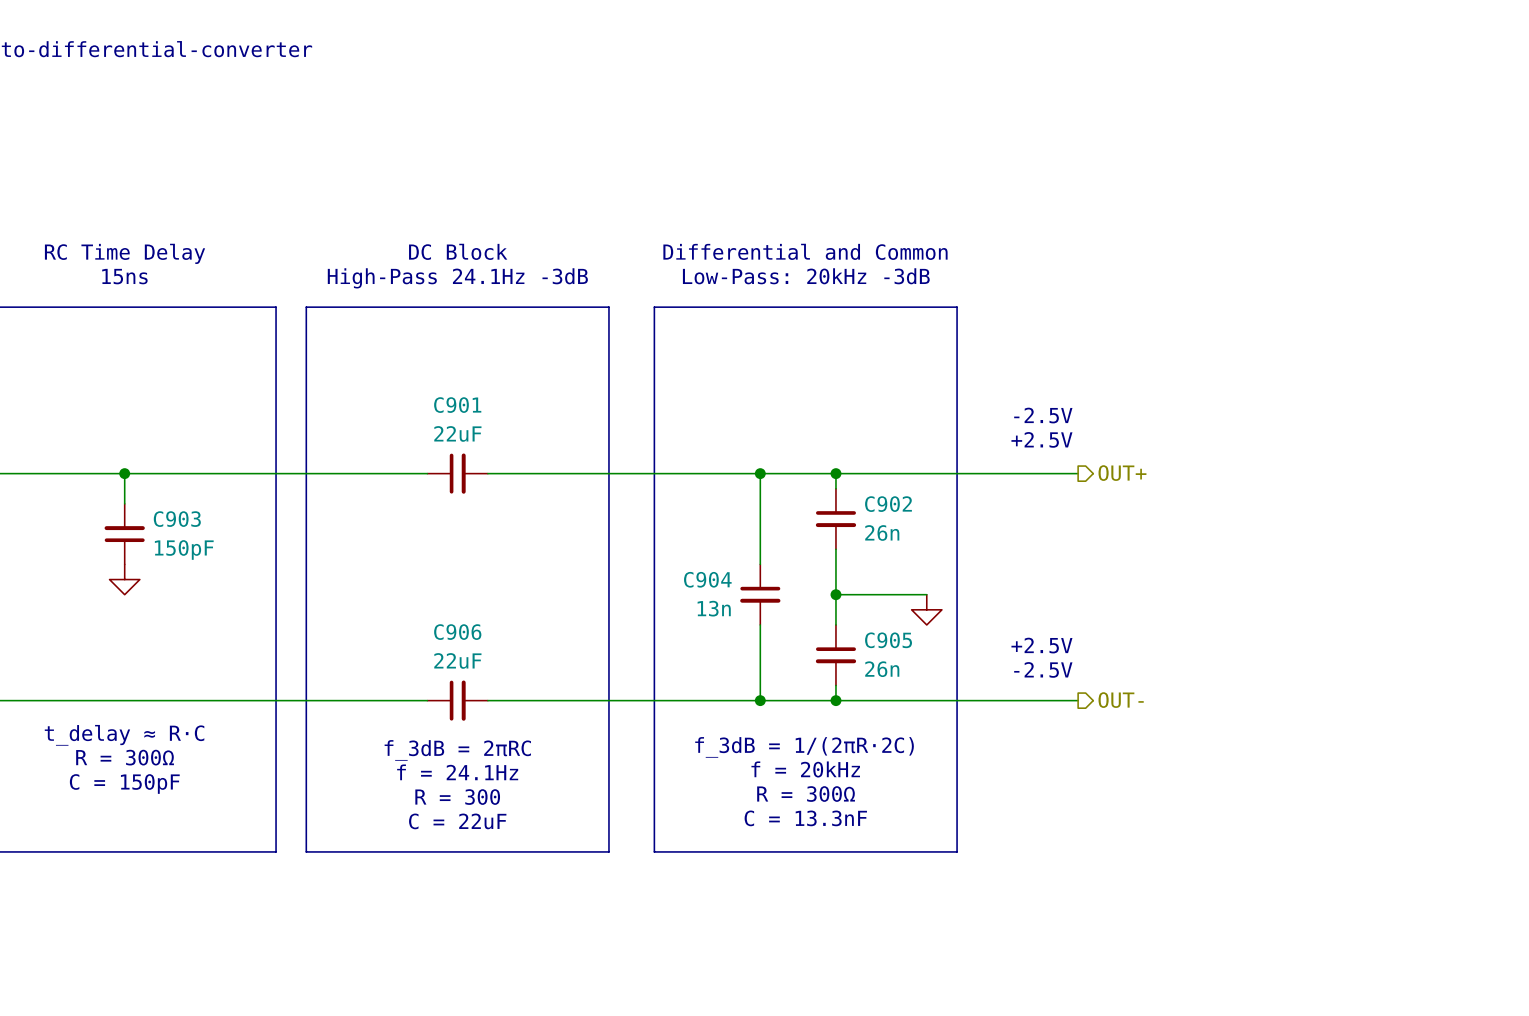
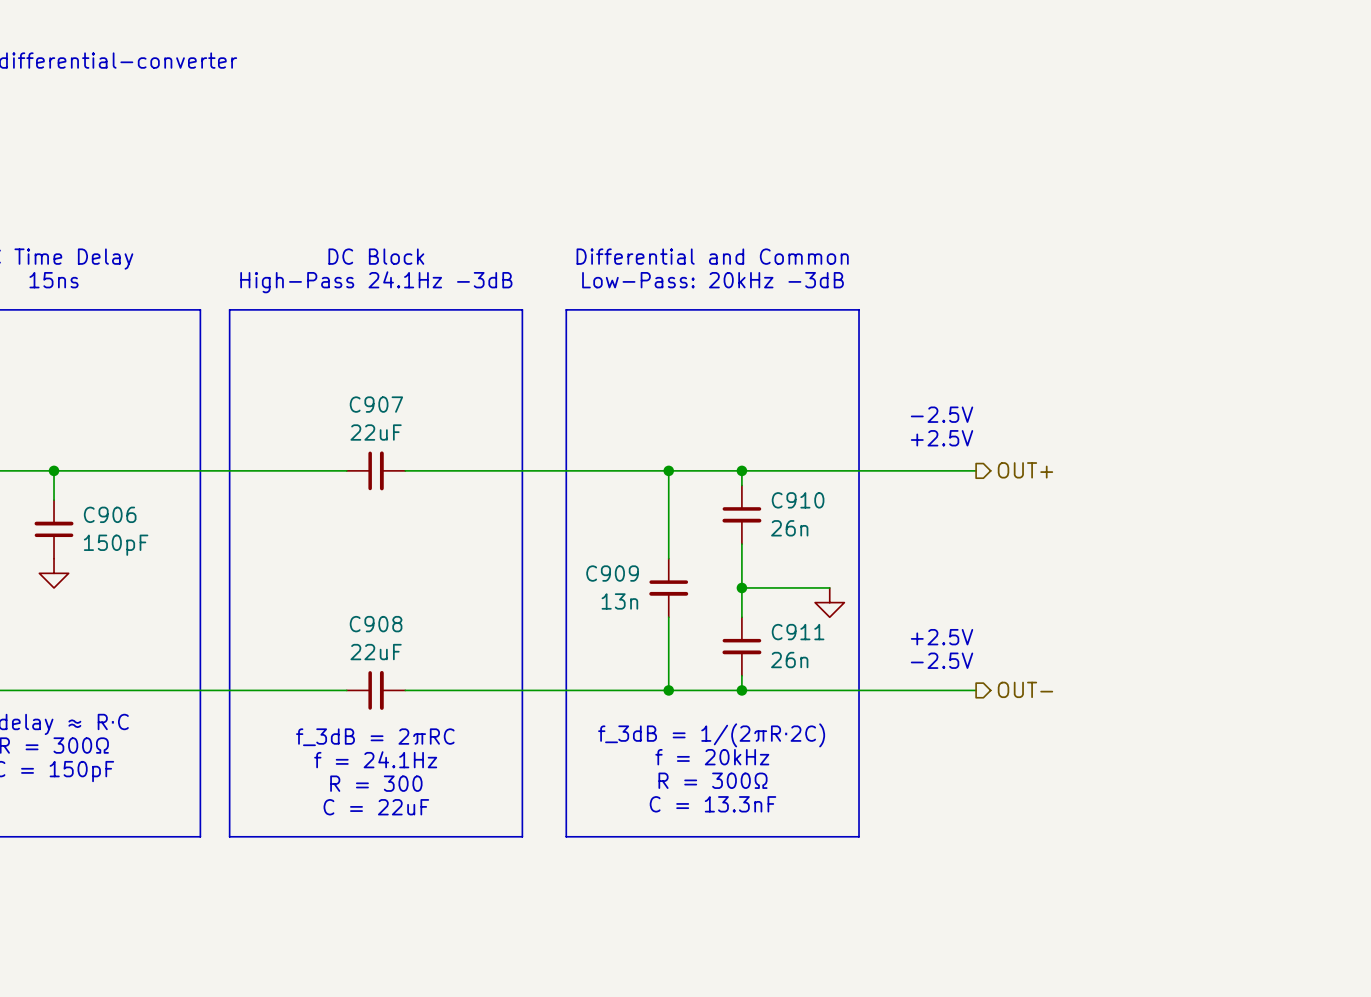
C901 name: C901 (457, 405) -> C907 (376, 404)
C902 name: C902 (888, 504) -> C910 (798, 500)
C903 name: C903 (177, 519) -> C906 (110, 514)
C904 name: C904 (707, 579) -> C909 (612, 573)
C906 name: C906 (457, 632) -> C908 (376, 624)
C905 name: C905 (888, 640) -> C911 (798, 632)

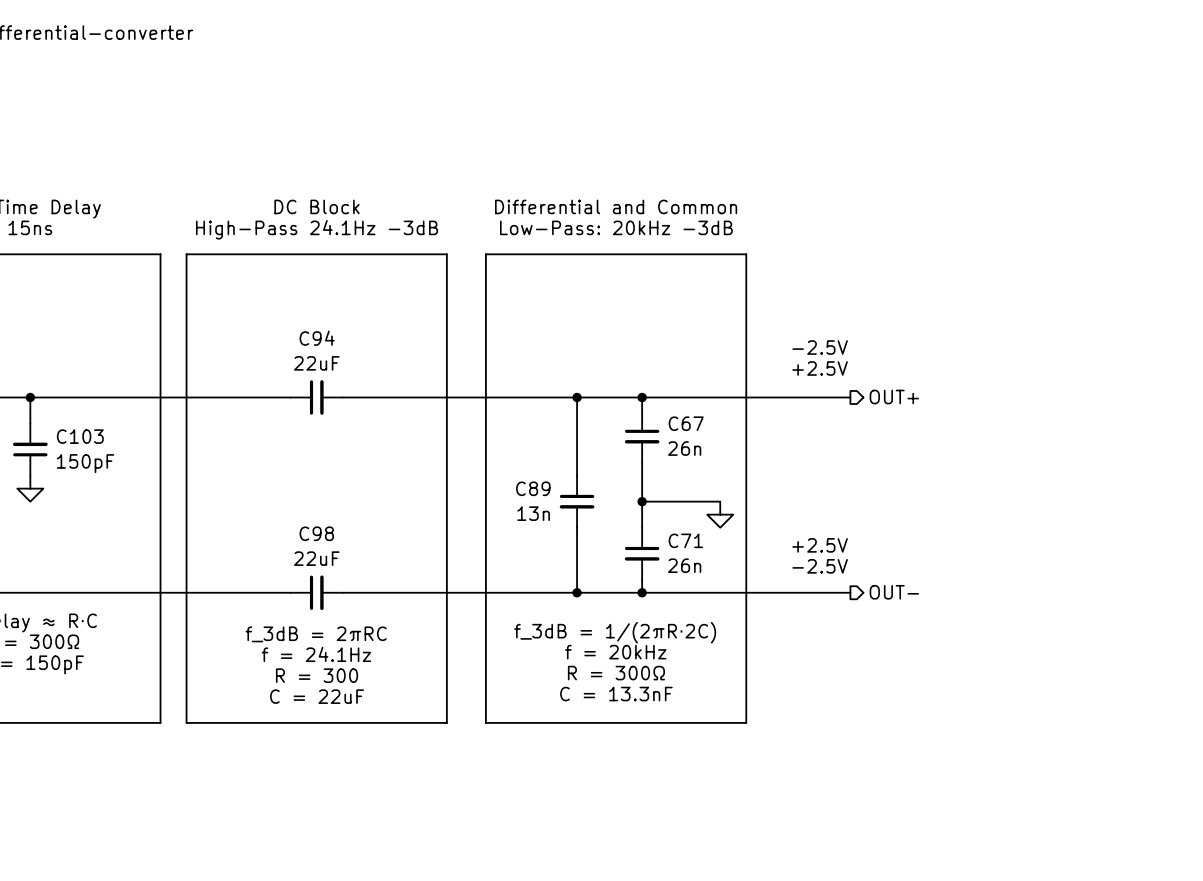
C907 name: C907 (376, 404) -> C94 (317, 338)
C910 name: C910 (798, 500) -> C67 (686, 423)
C906 name: C906 (110, 514) -> C103 (80, 436)
C909 name: C909 (612, 573) -> C89 (533, 488)
C908 name: C908 (376, 624) -> C98 (316, 533)
C911 name: C911 (798, 632) -> C71 (685, 540)

